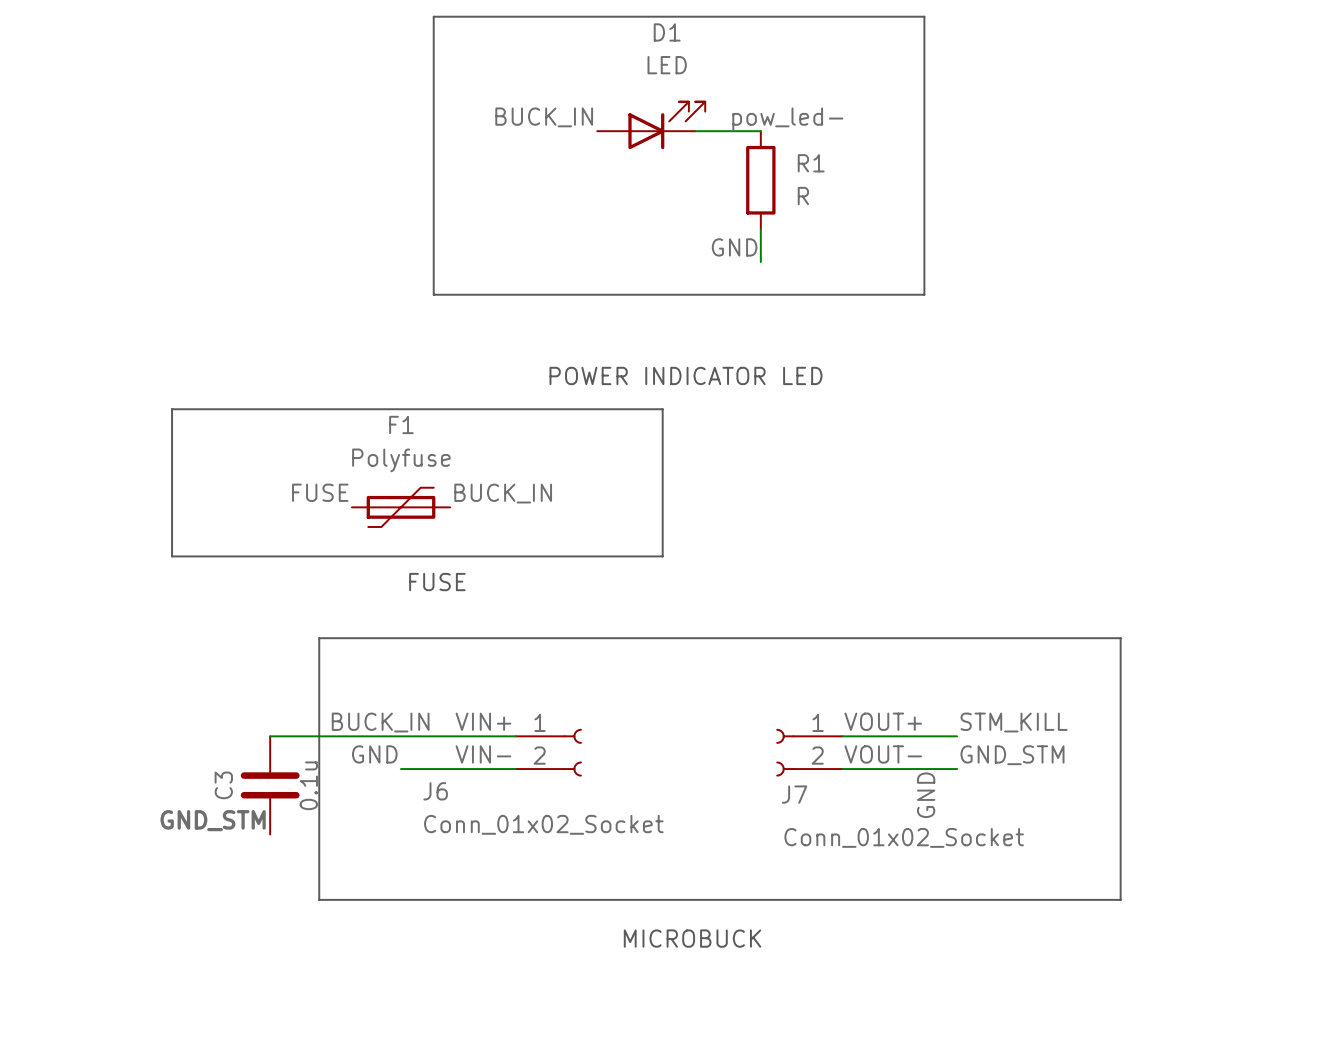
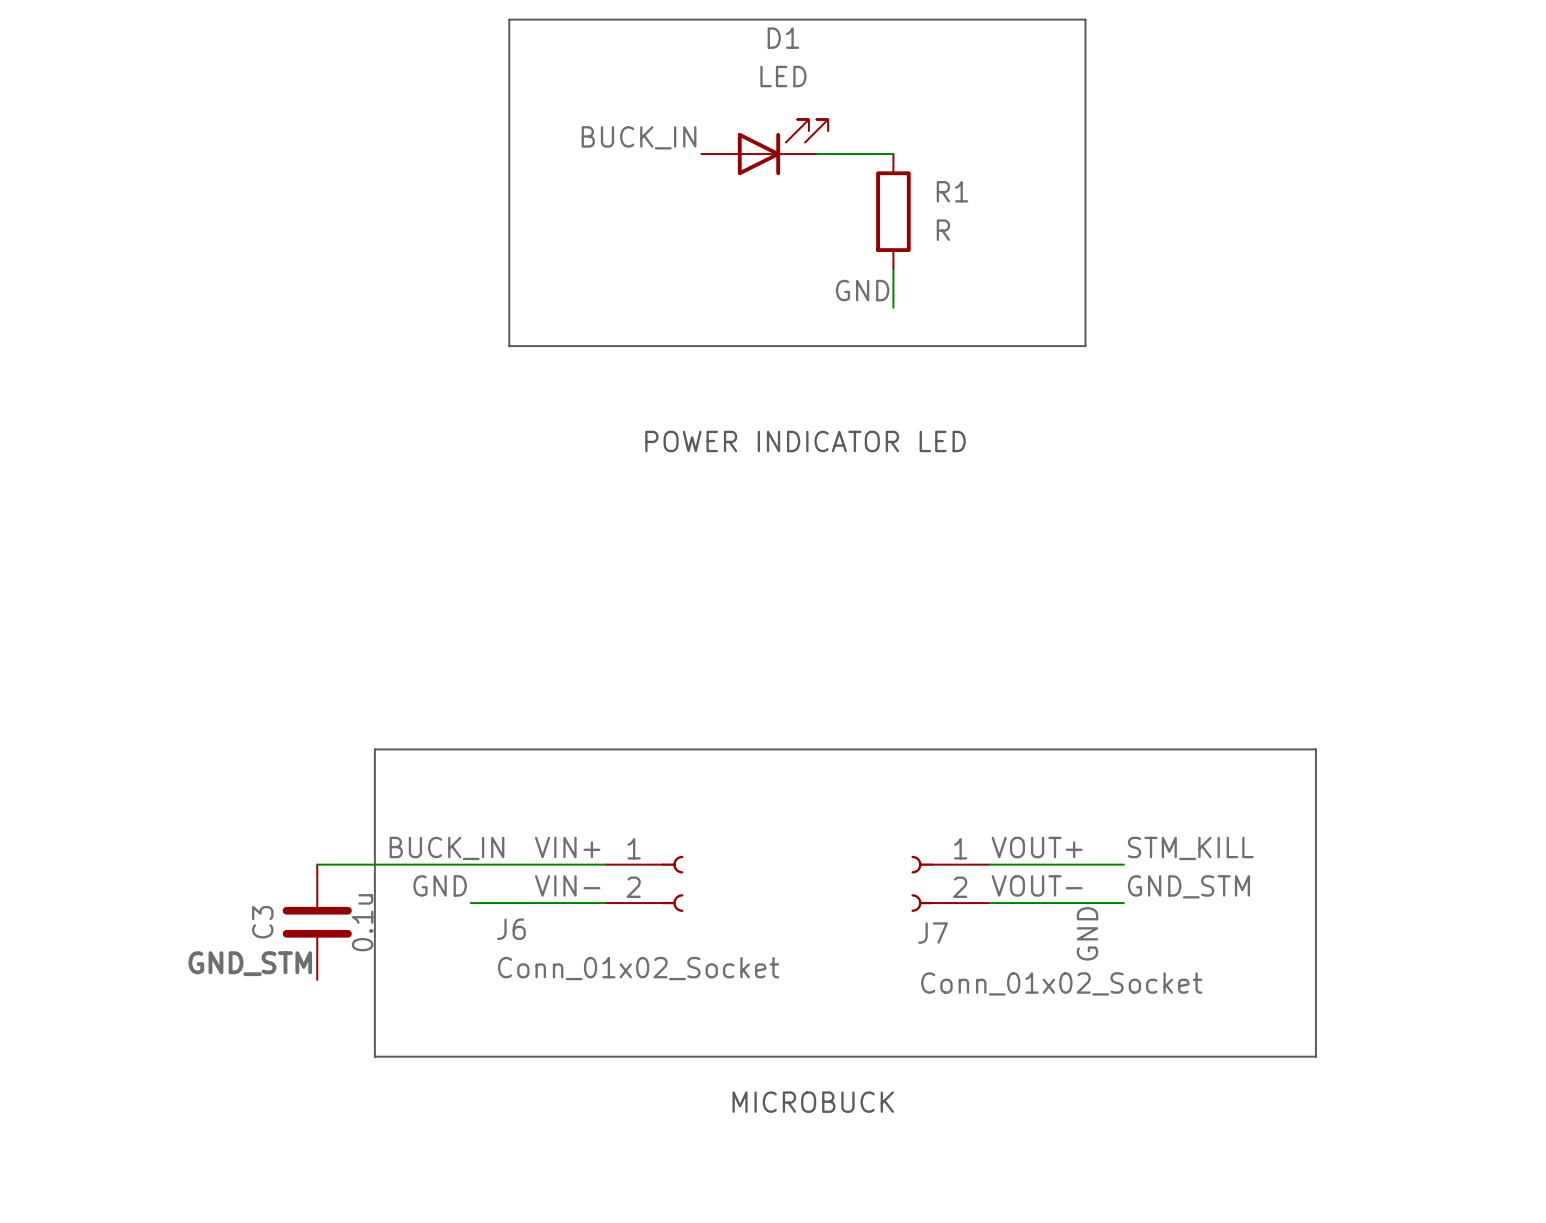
label: pow_led- (787, 119) -> none
line: (172, 409) (662, 409) (662, 556) (172, 556) (172, 409) -> none
label: FUSE (320, 492) -> none
label: BUCK_IN (503, 493) -> none
F1: Polyfuse (401, 507) -> none
text: FUSE (437, 582) -> none

